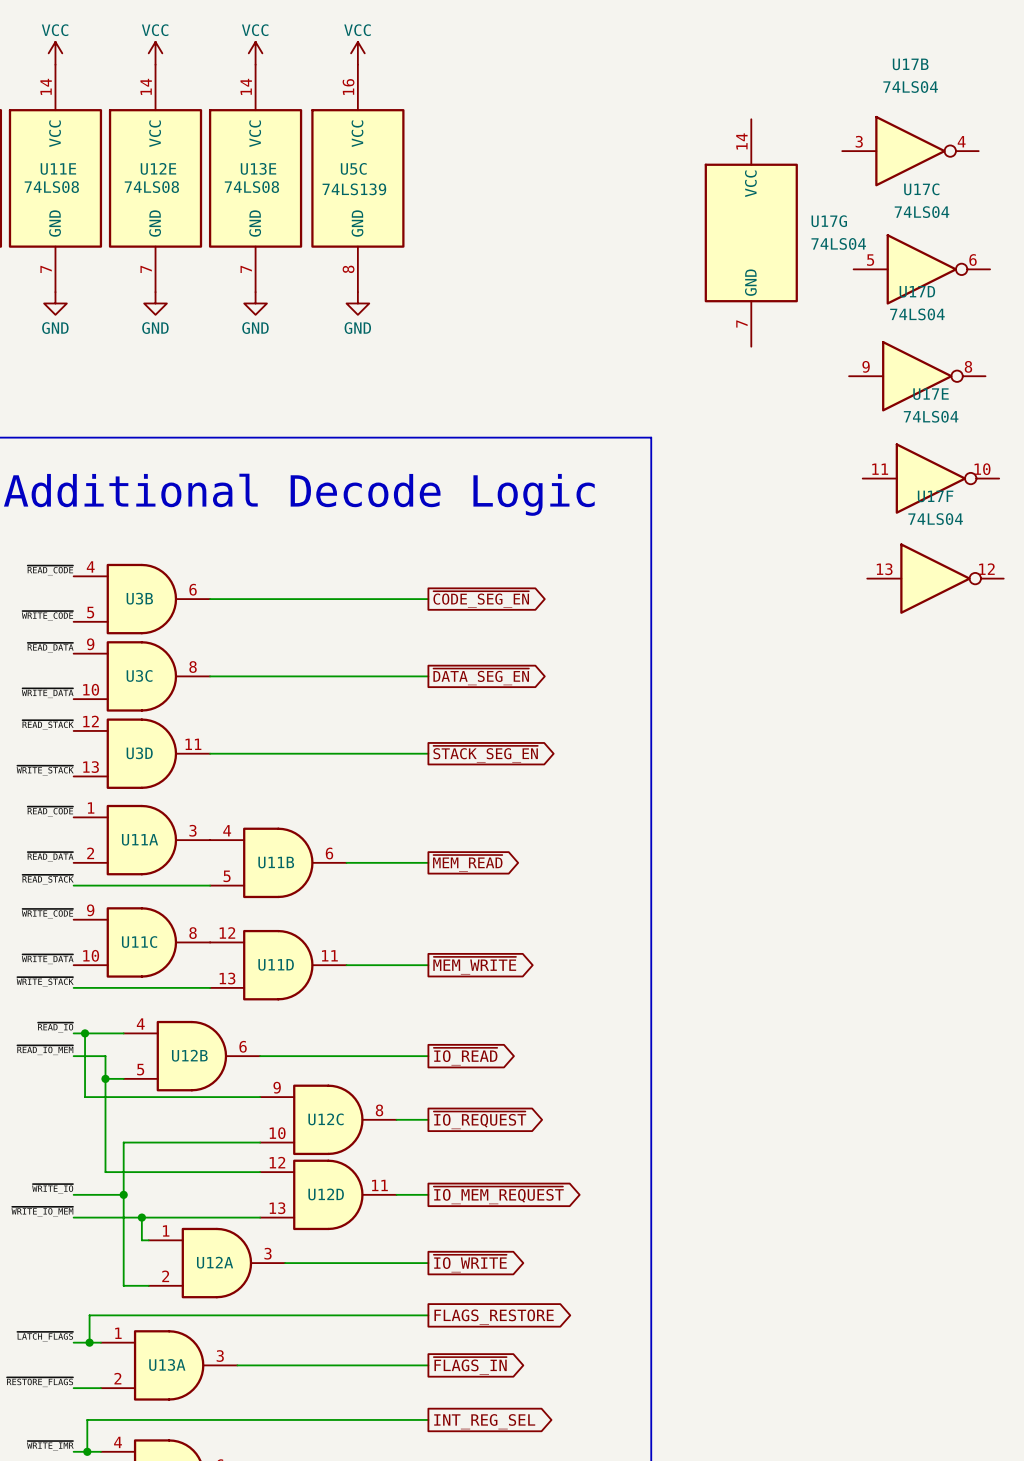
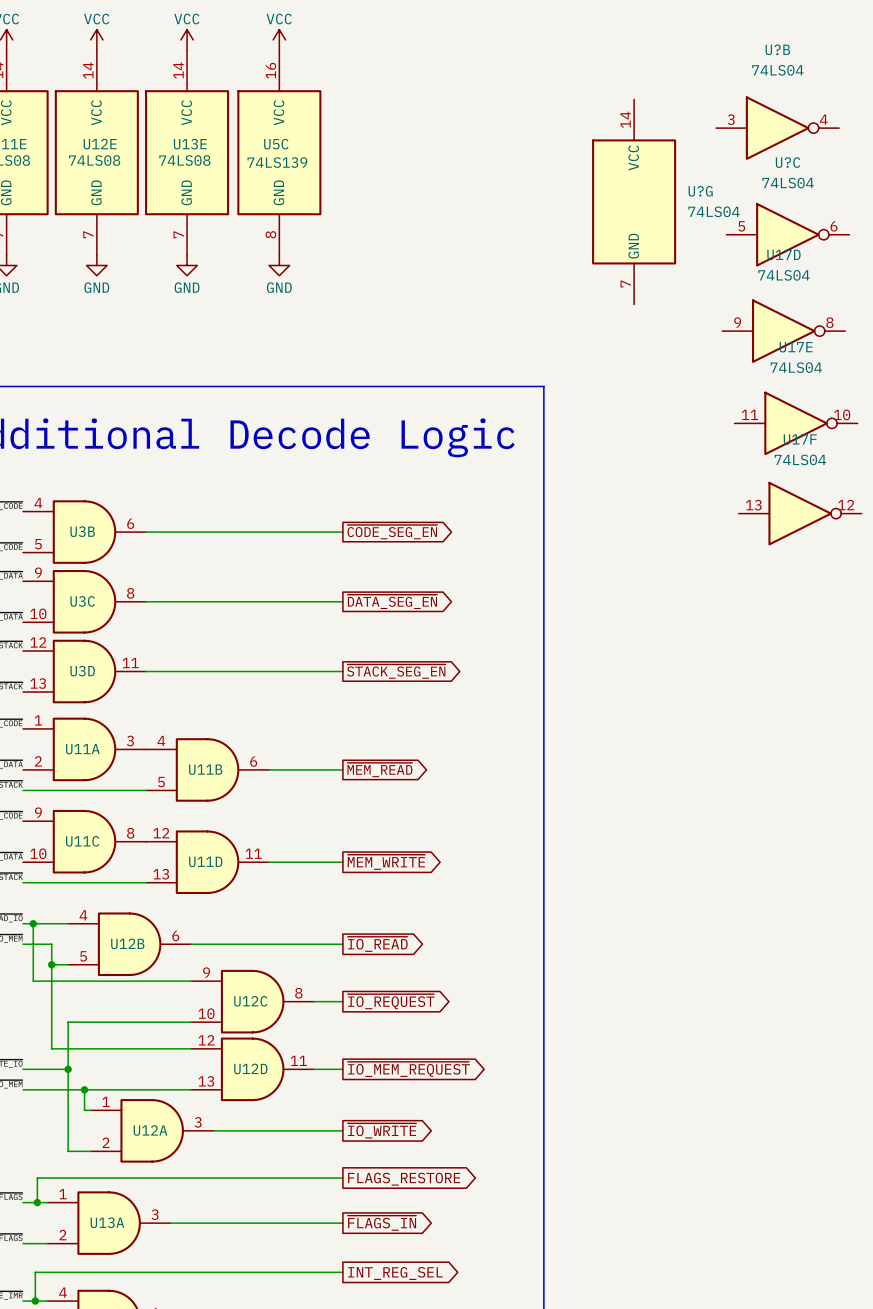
U17B name: U17B (910, 64) -> U?B (777, 49)
U17C name: U17C (921, 189) -> U?C (788, 162)
U17G name: U17G (829, 221) -> U?G (700, 191)

